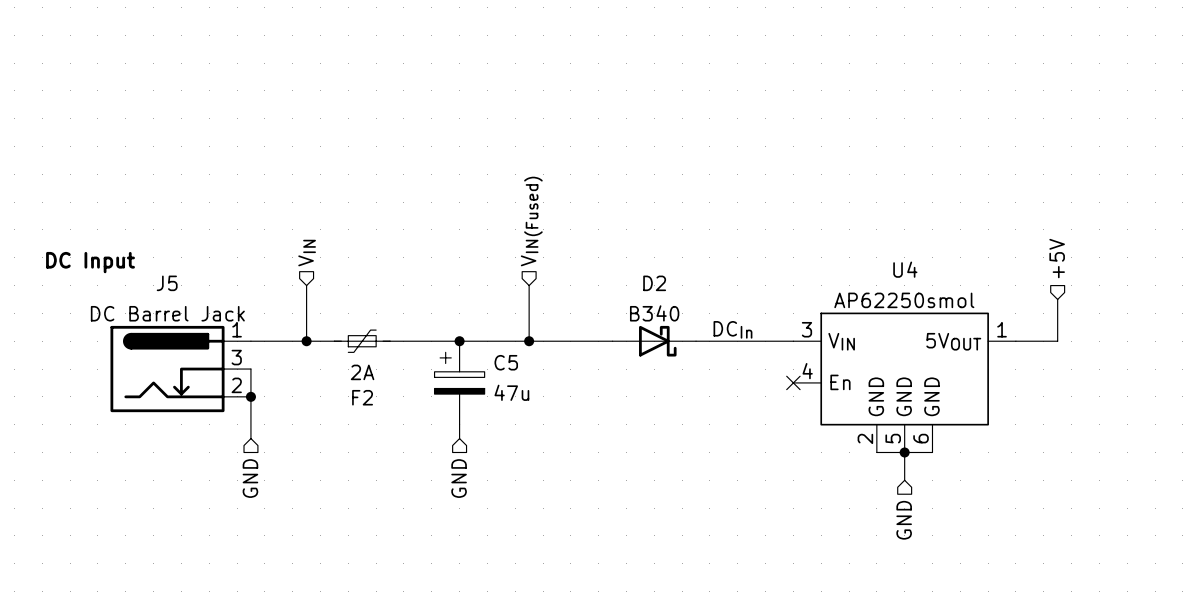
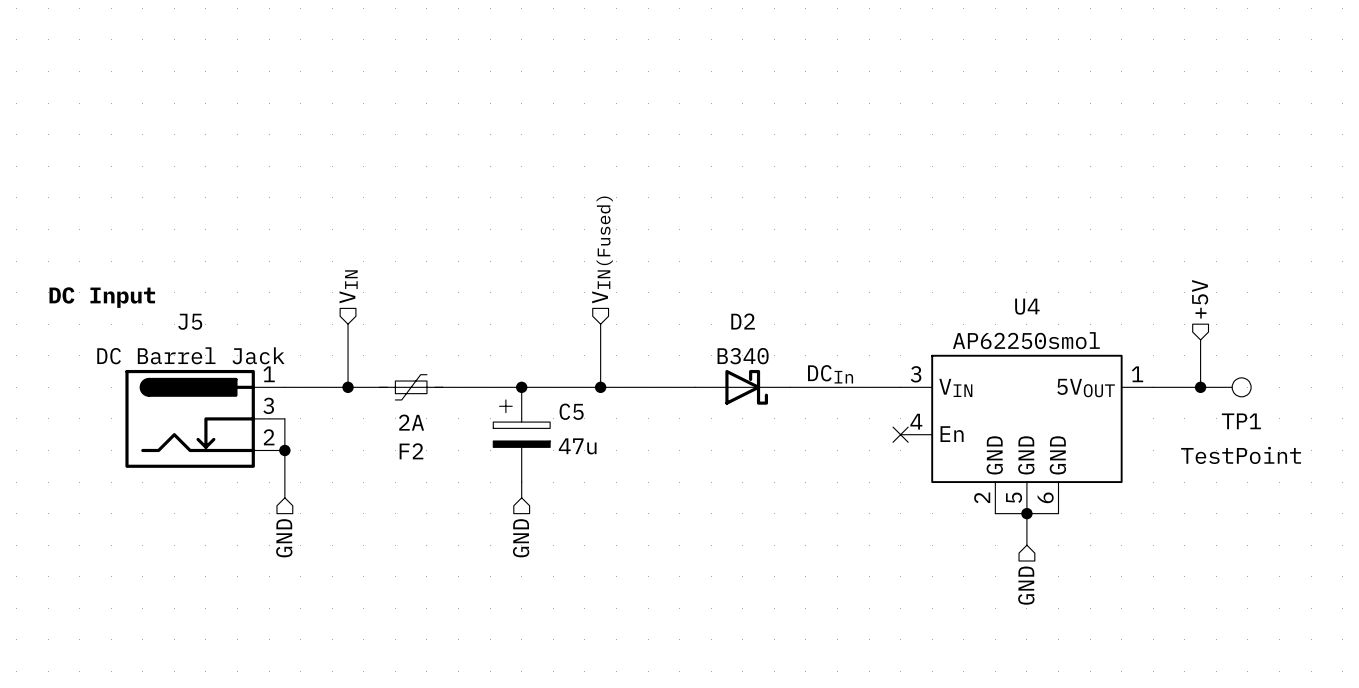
junction: none -> (1200, 387)
TP1: none -> TestPoint (1225, 387)

